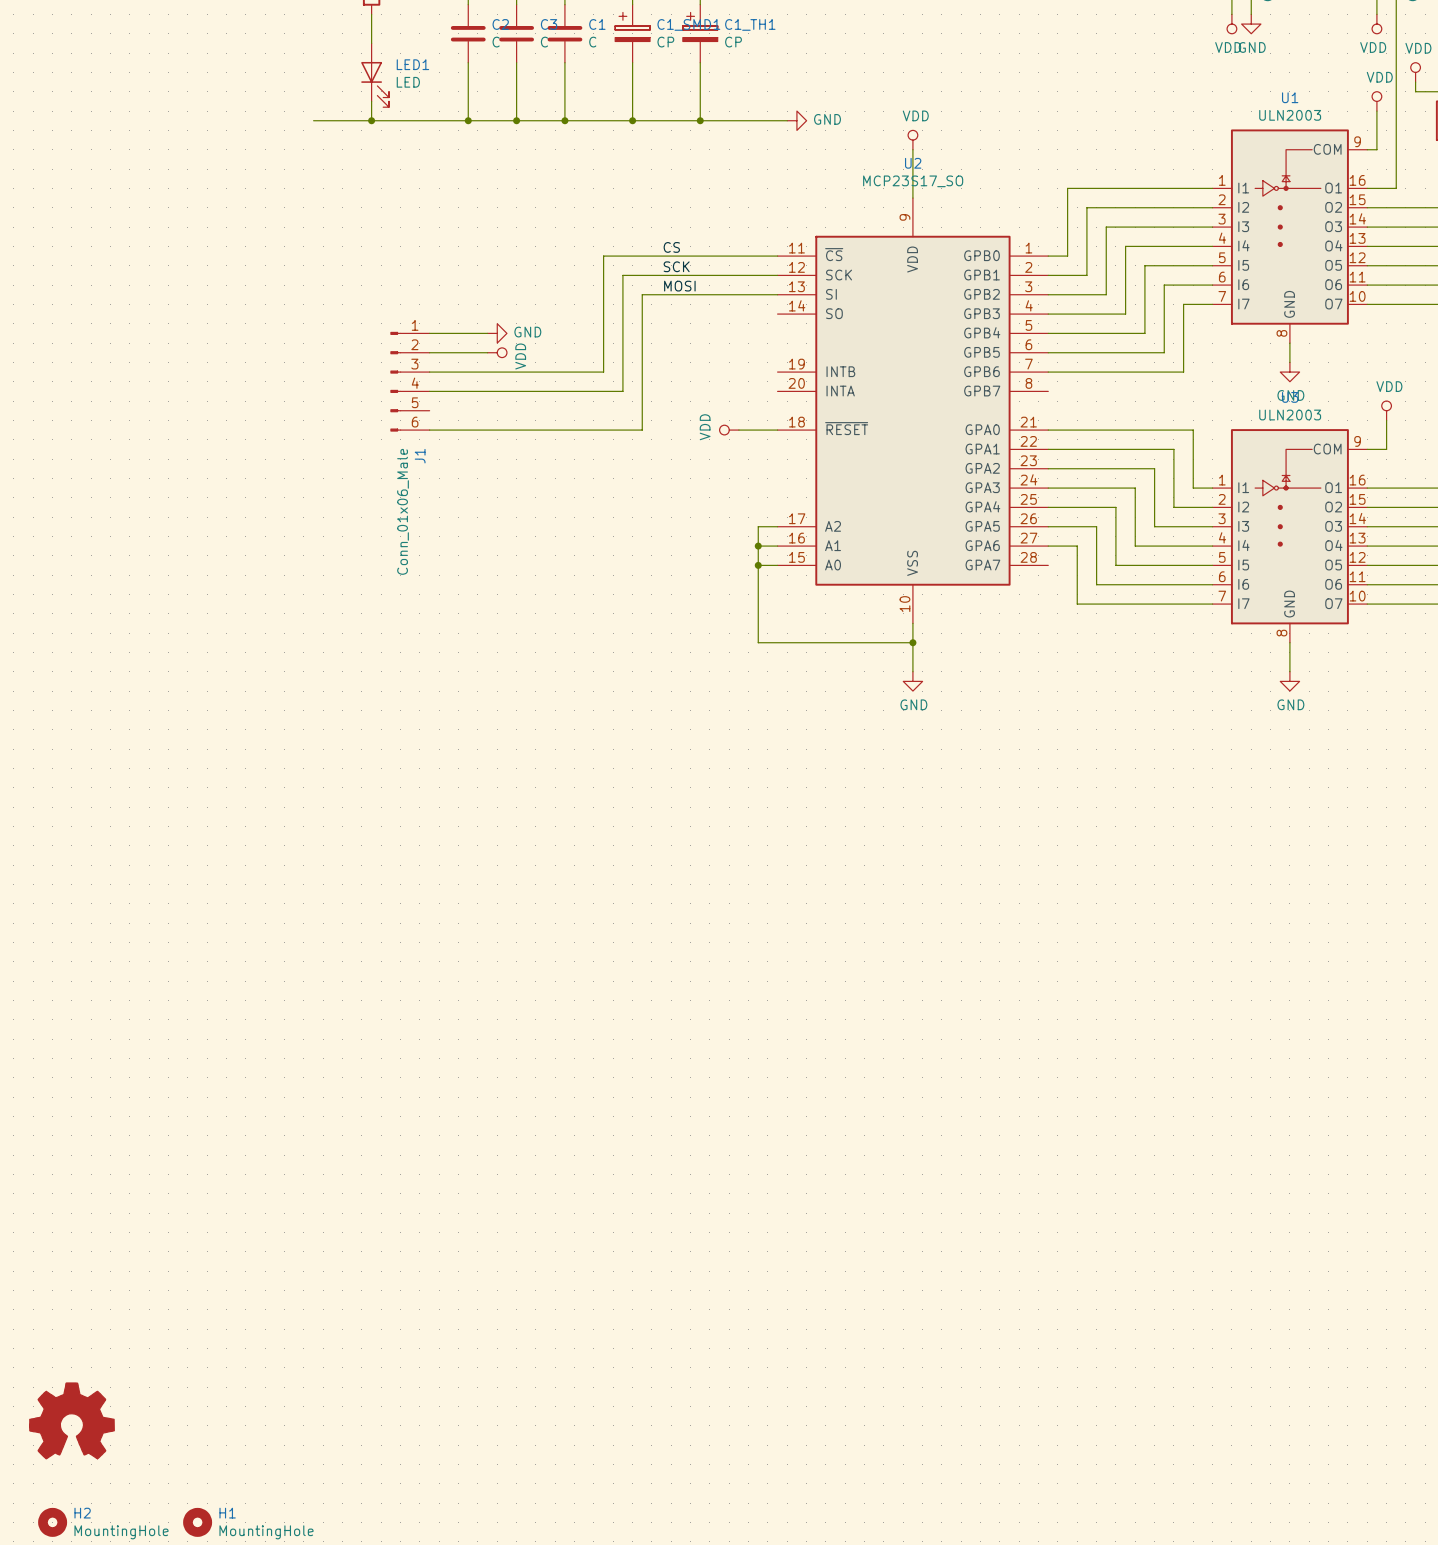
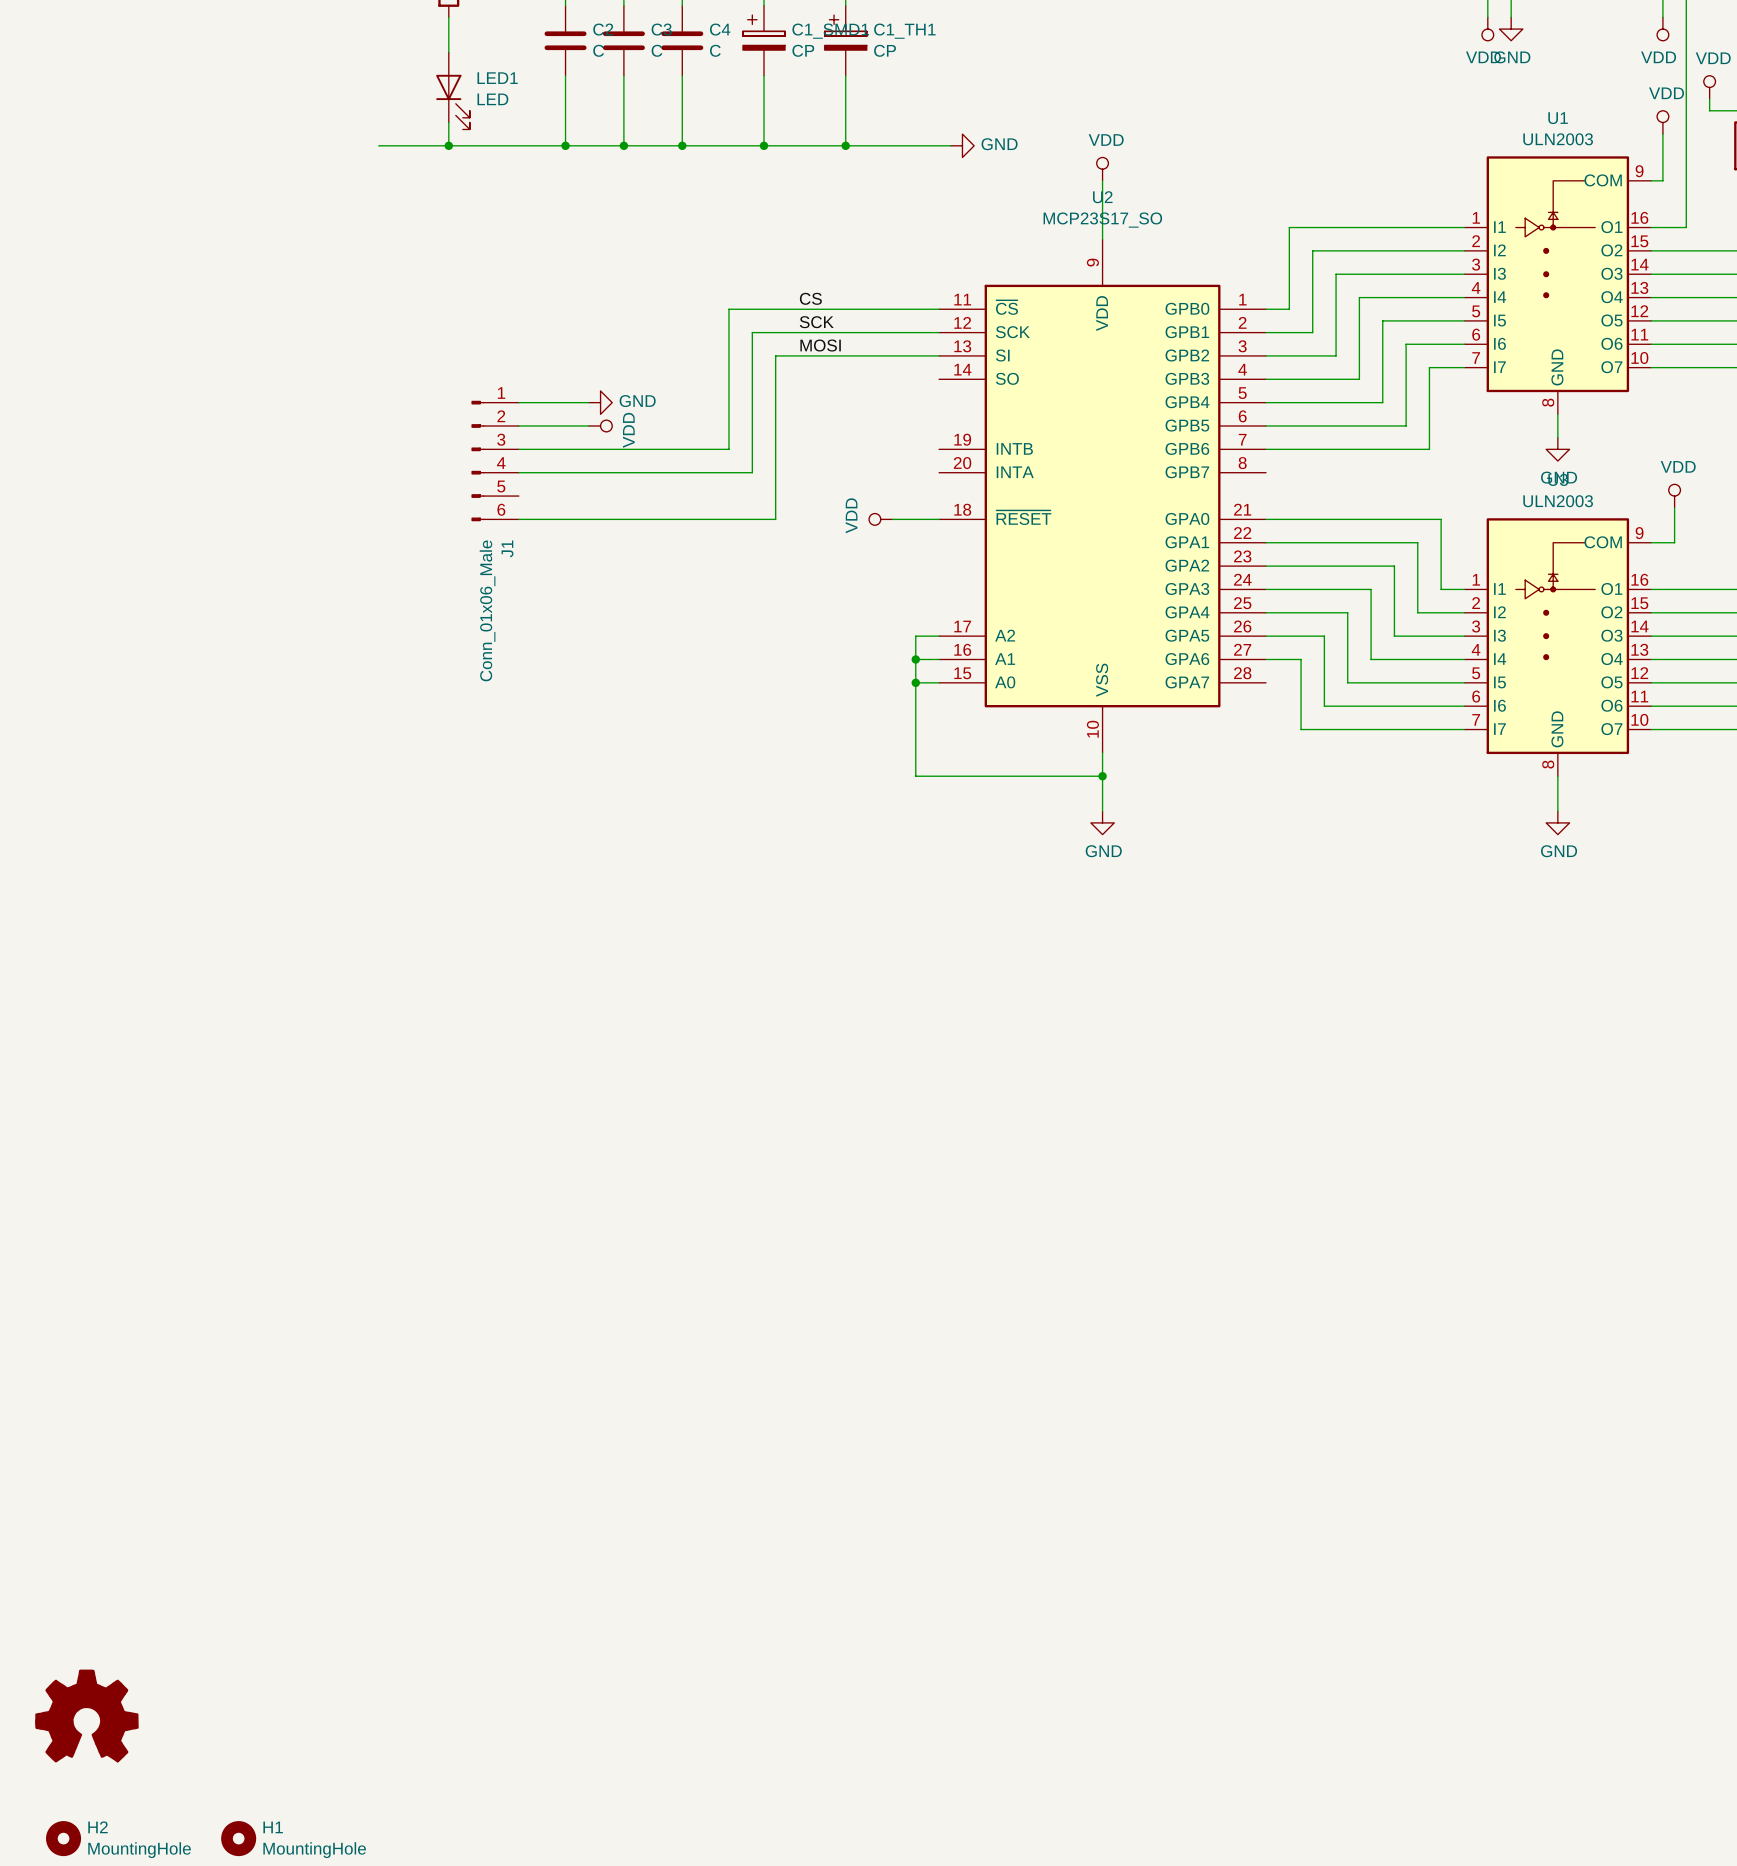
C1 name: C1 (597, 24) -> C4 (720, 29)

